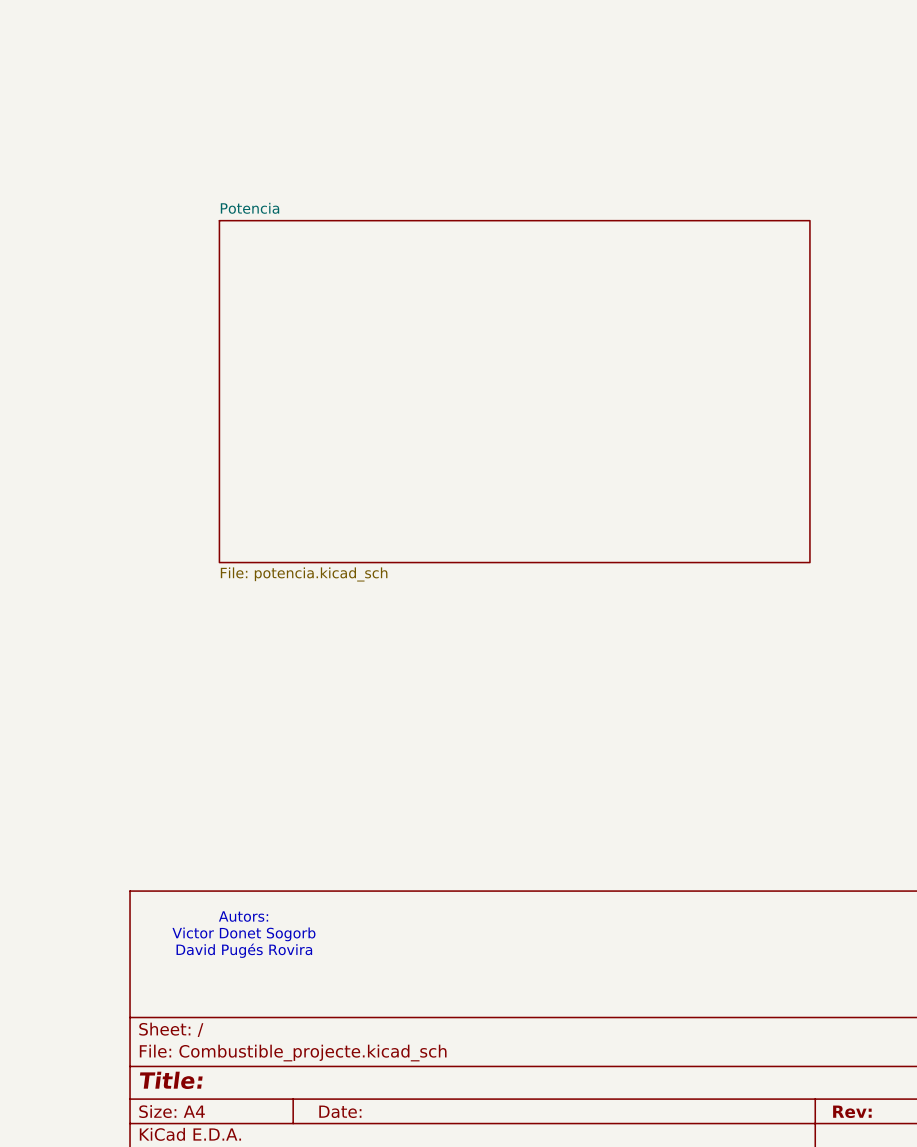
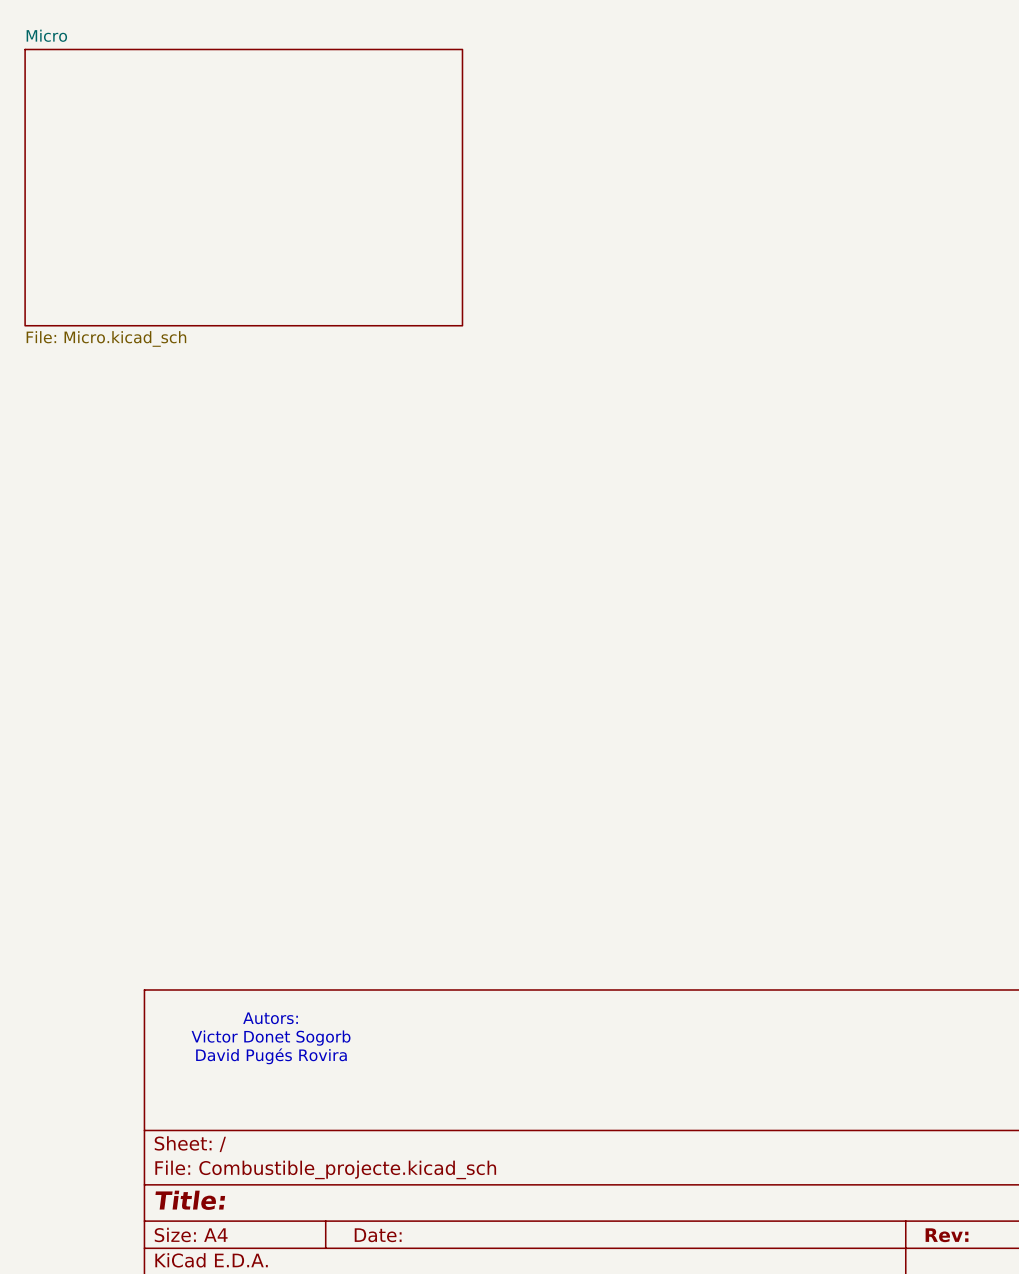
sheet Micro: none -> File: Micro.kicad_sch (243, 187)
sheet Potencia: File: potencia.kicad_sch (514, 391) -> none

